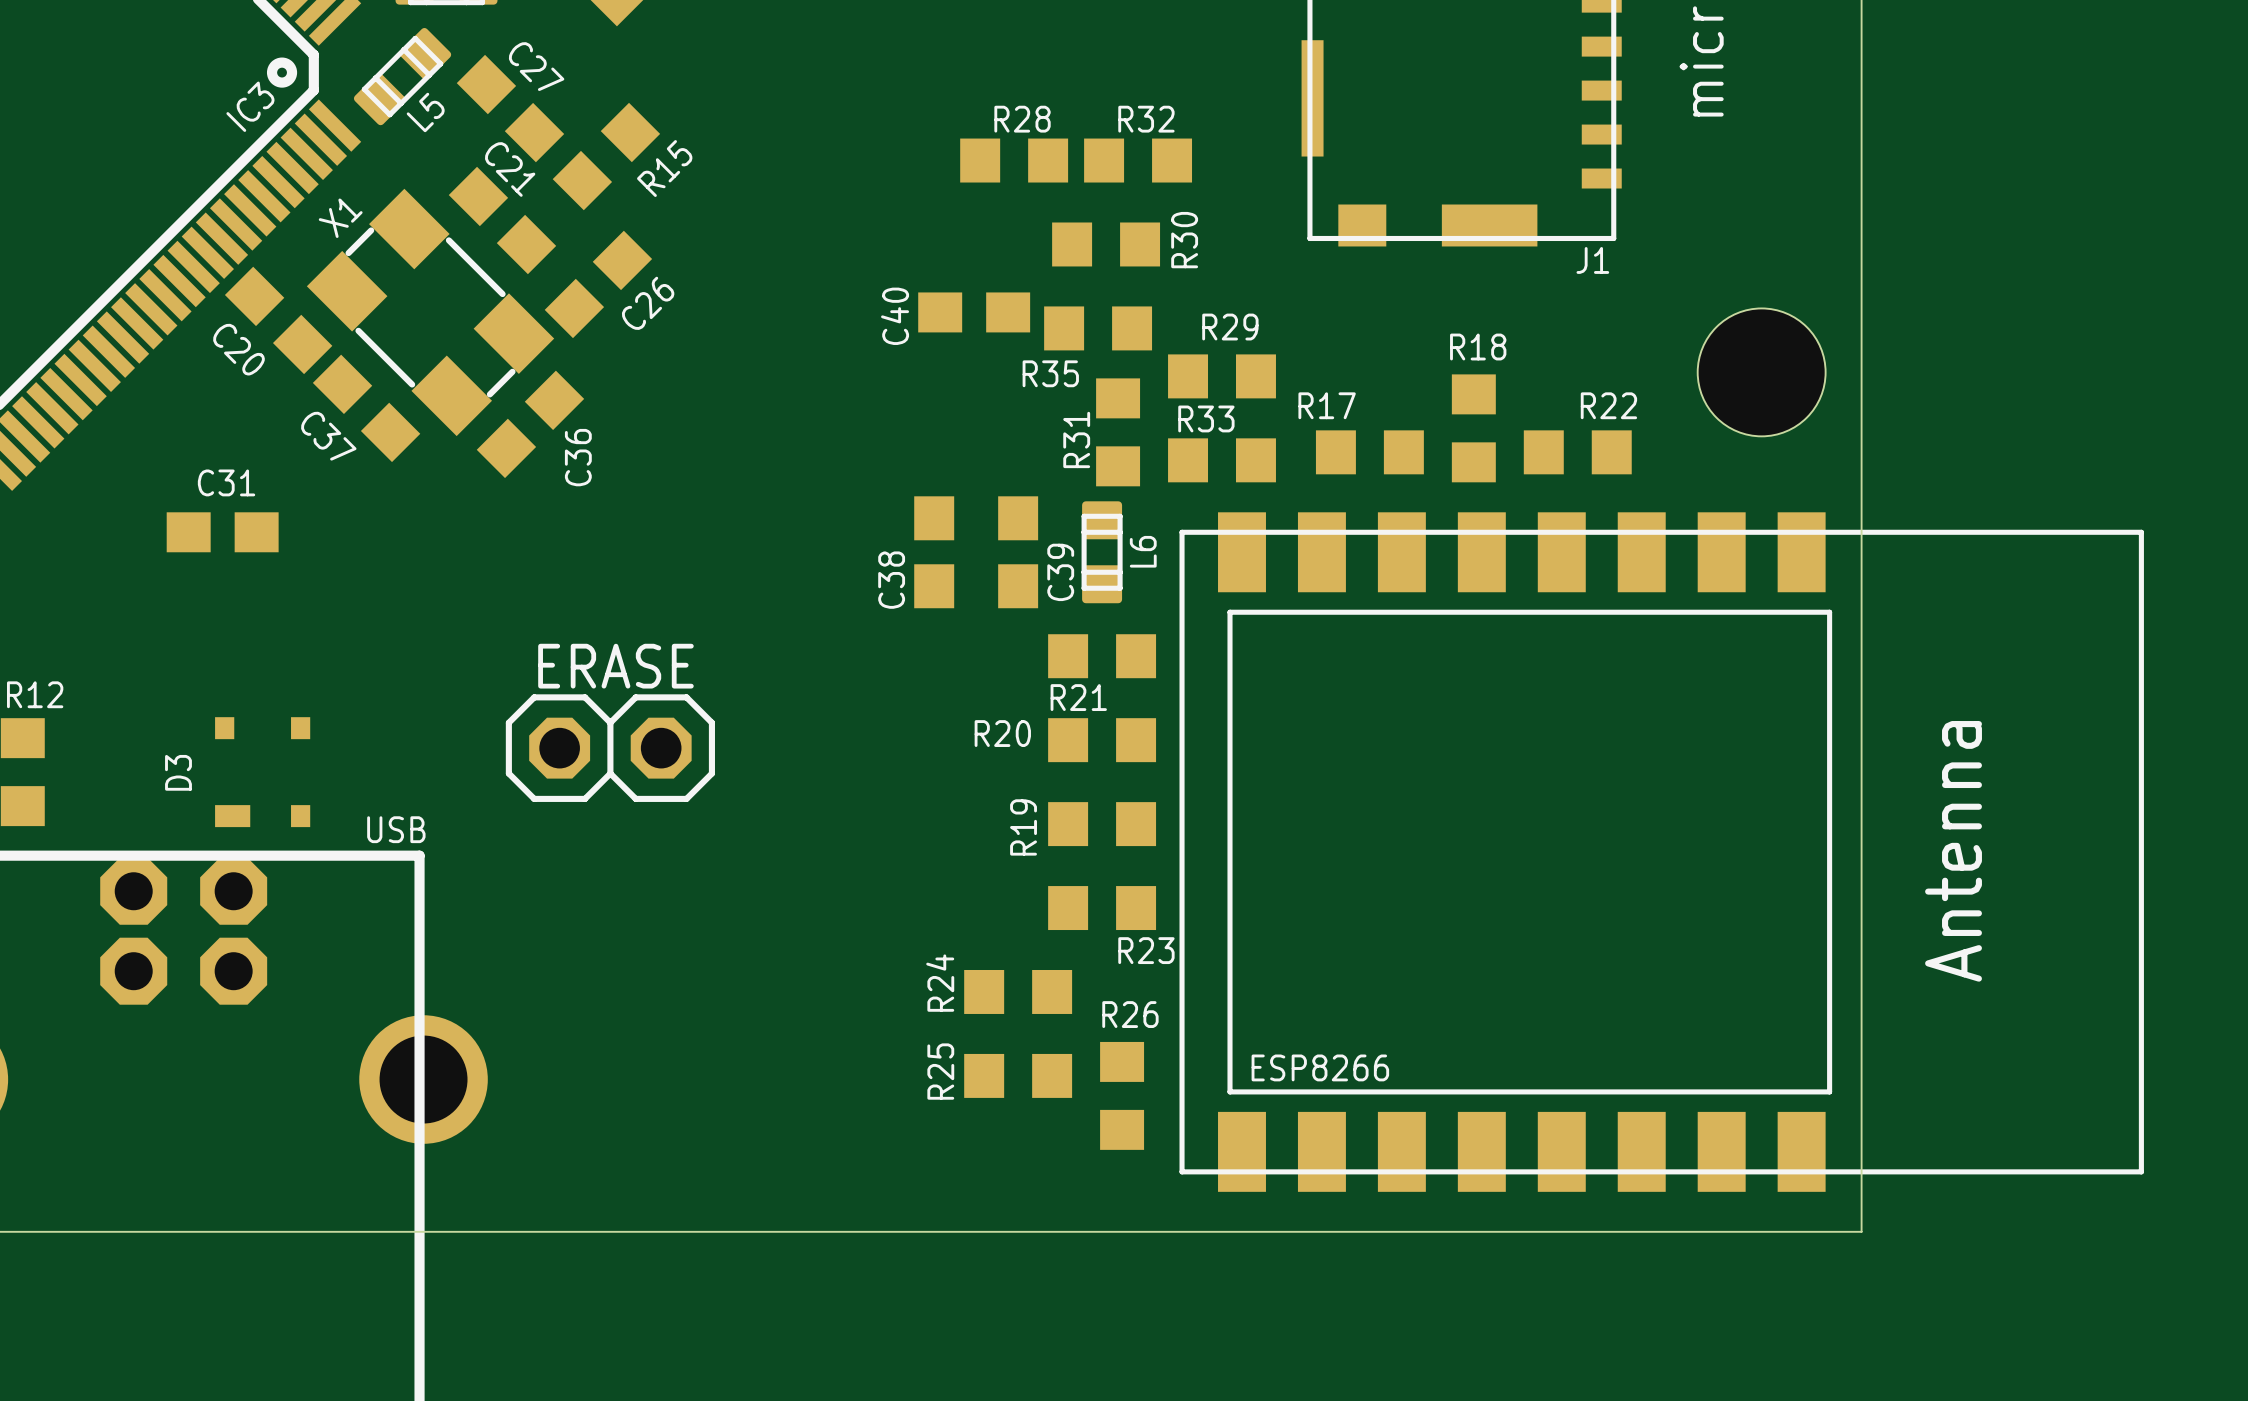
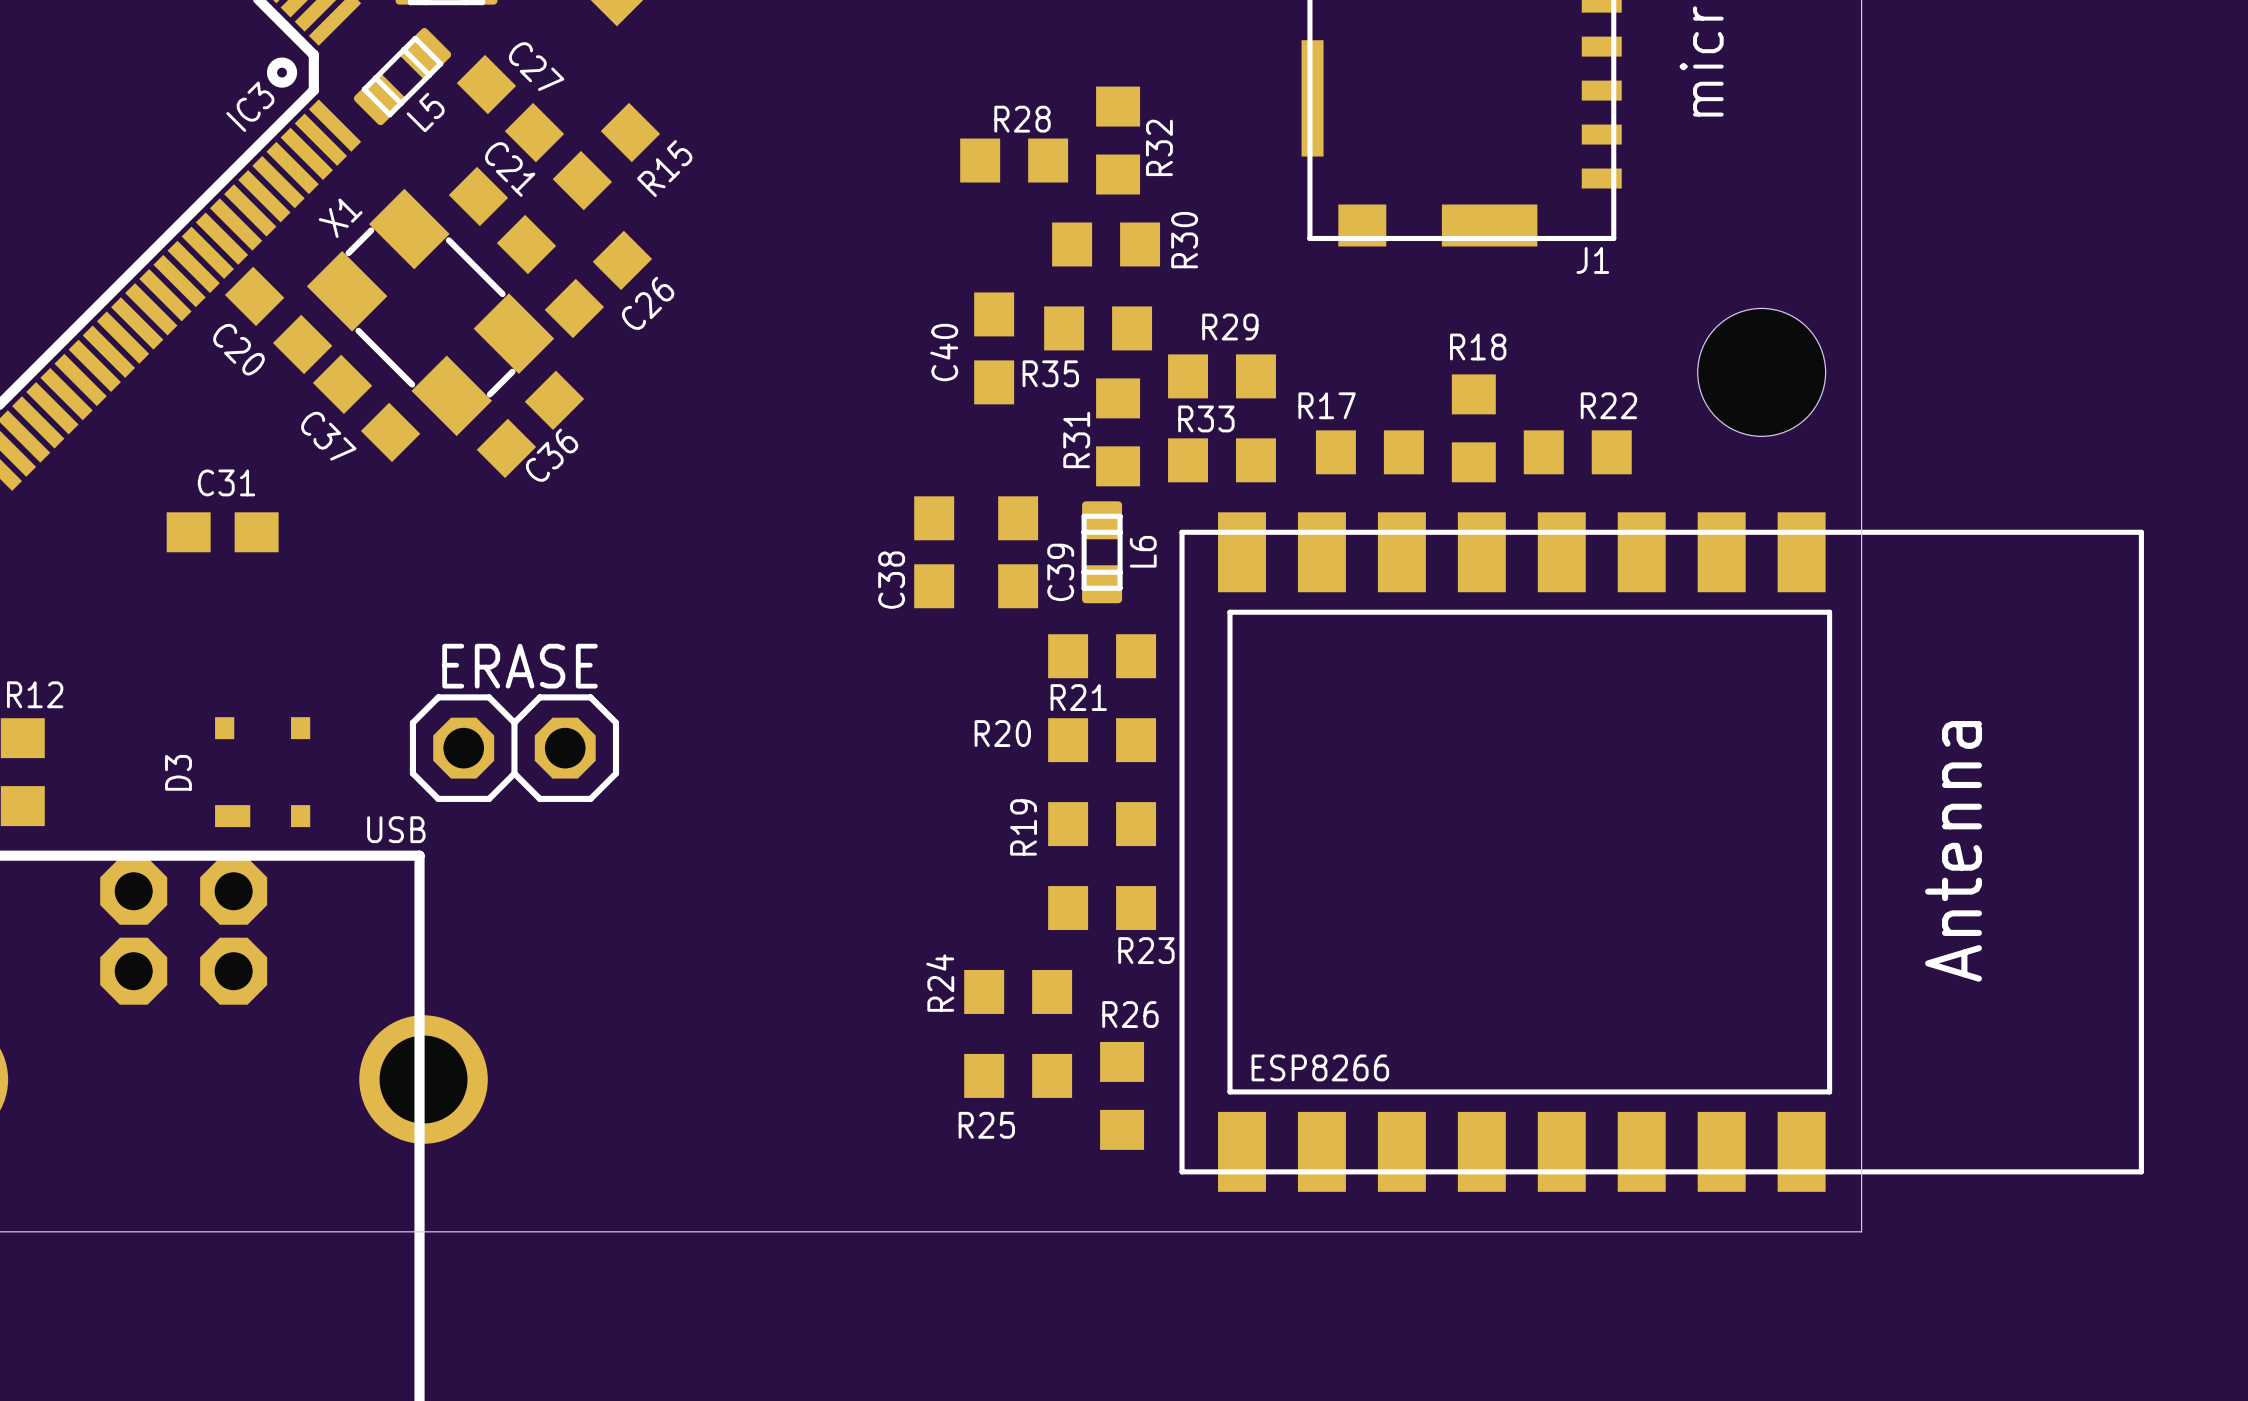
R32 rotation: 0° (1138, 160) -> 90° clockwise (1118, 140)
C40 rotation: 0° (974, 312) -> 90° clockwise (994, 348)
C36 name rotation: 0° (578, 457) -> 45° clockwise (552, 455)
ERASE position: (610, 748) -> (514, 748)
R25 name rotation: 0° (940, 1071) -> 90° clockwise (986, 1125)

